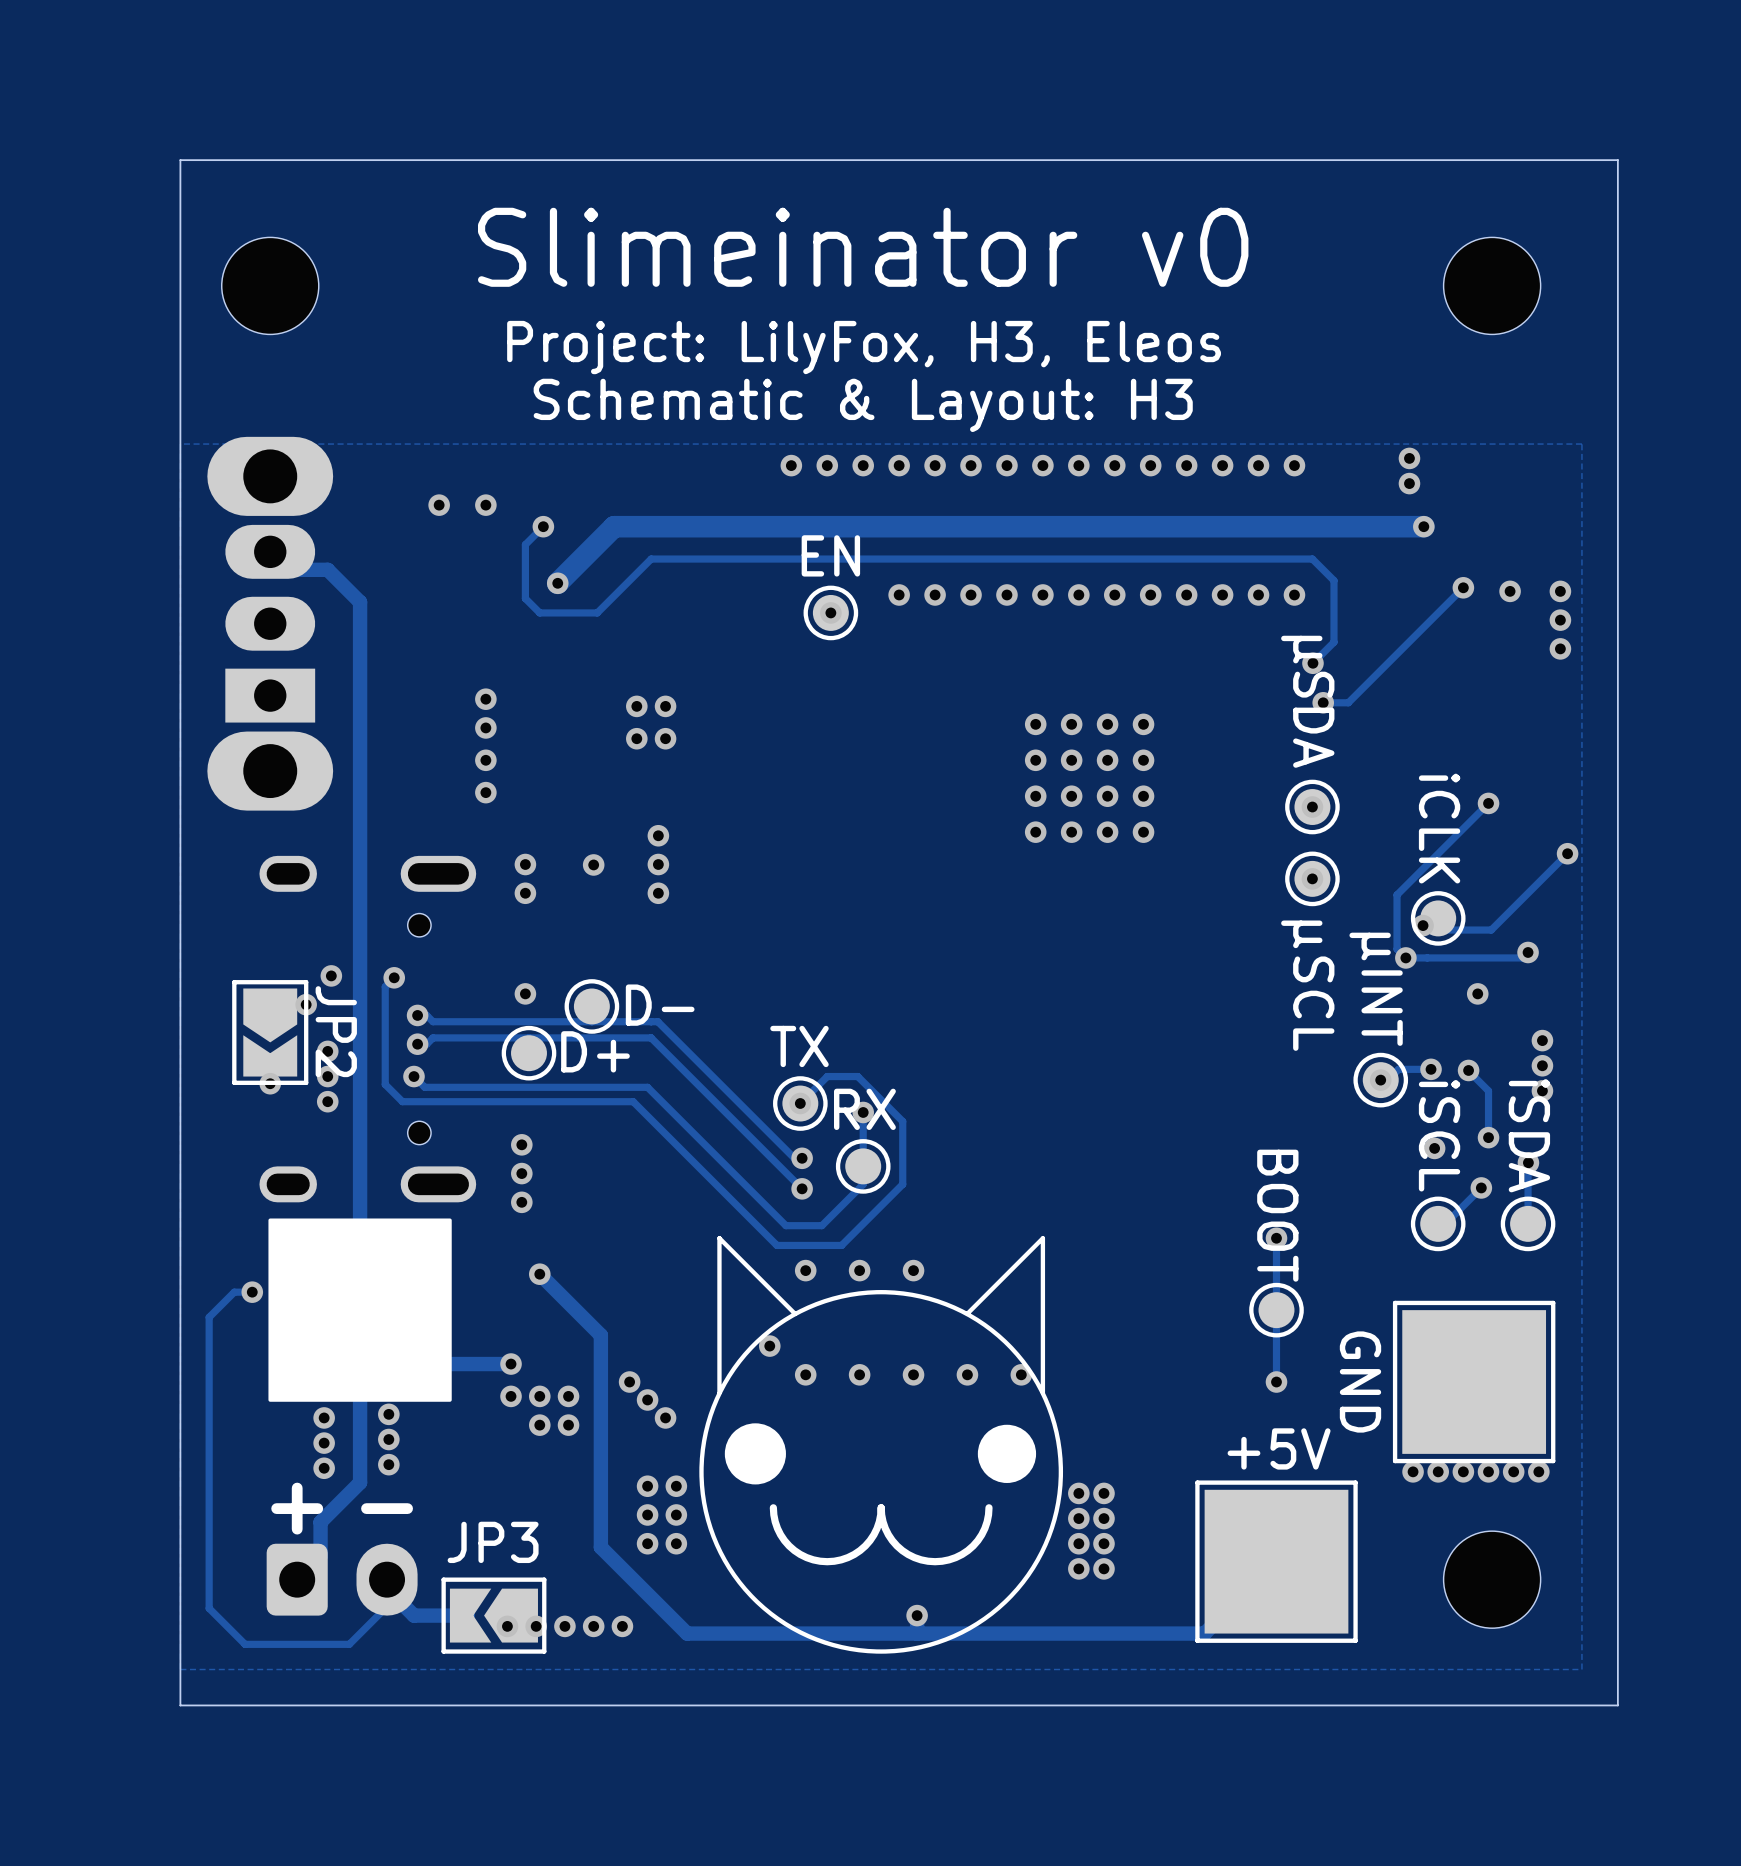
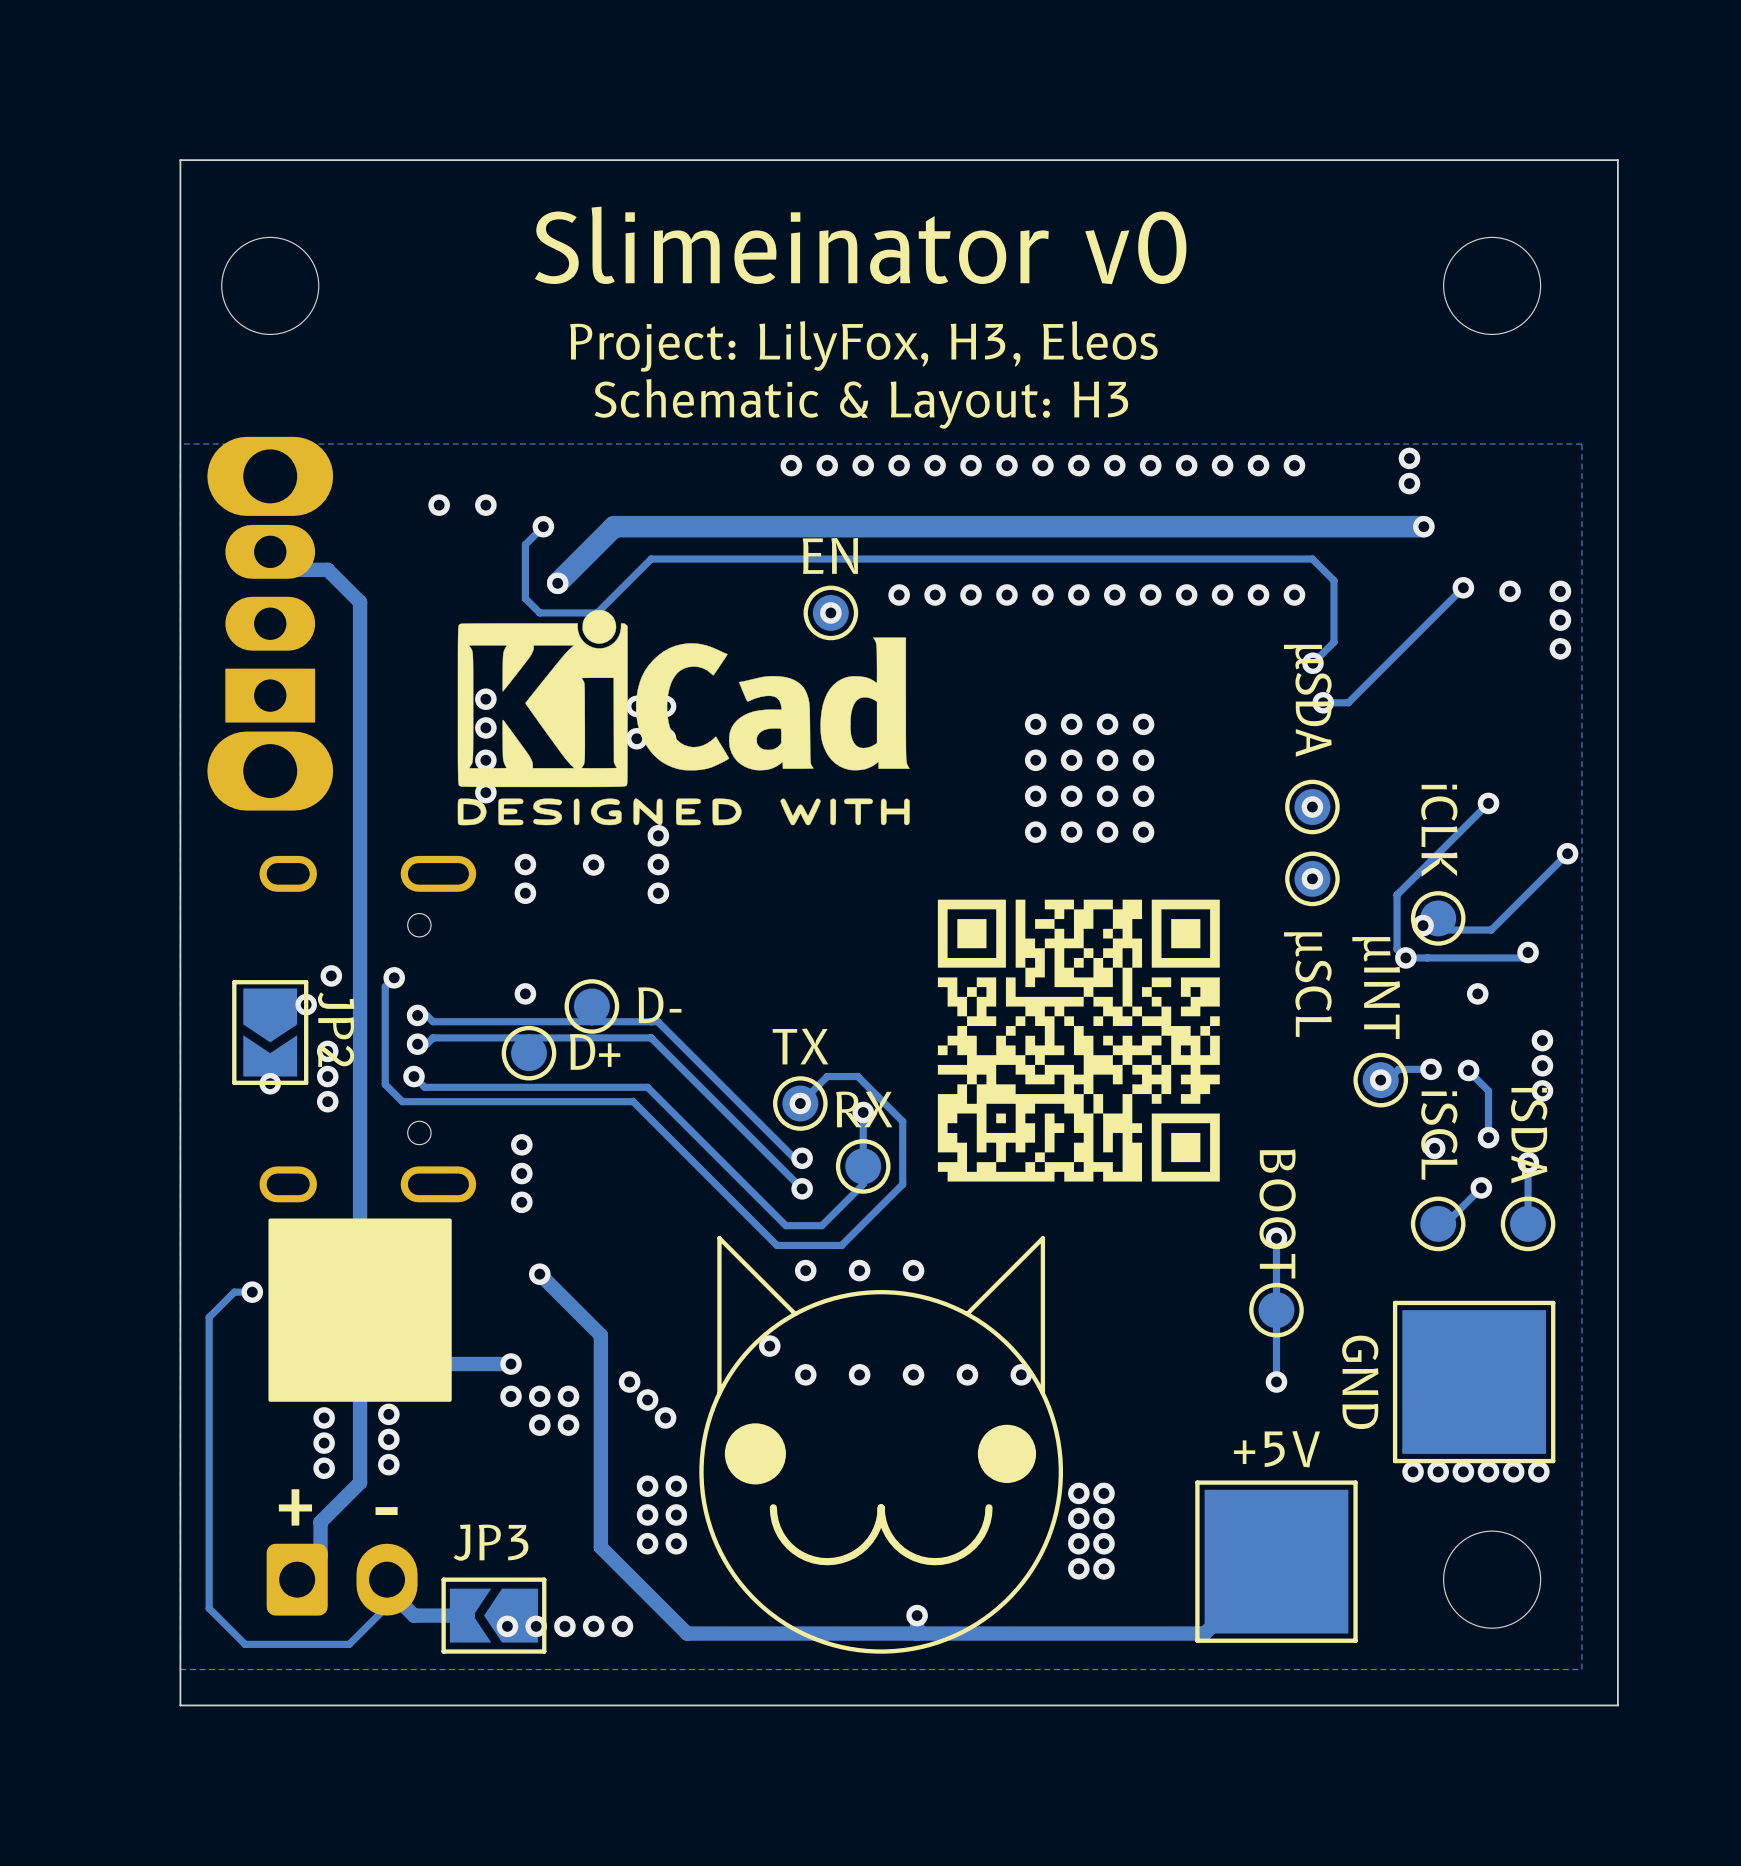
drawing: none -> [457, 609, 910, 826]
drawing: none -> [937, 899, 1220, 1182]

